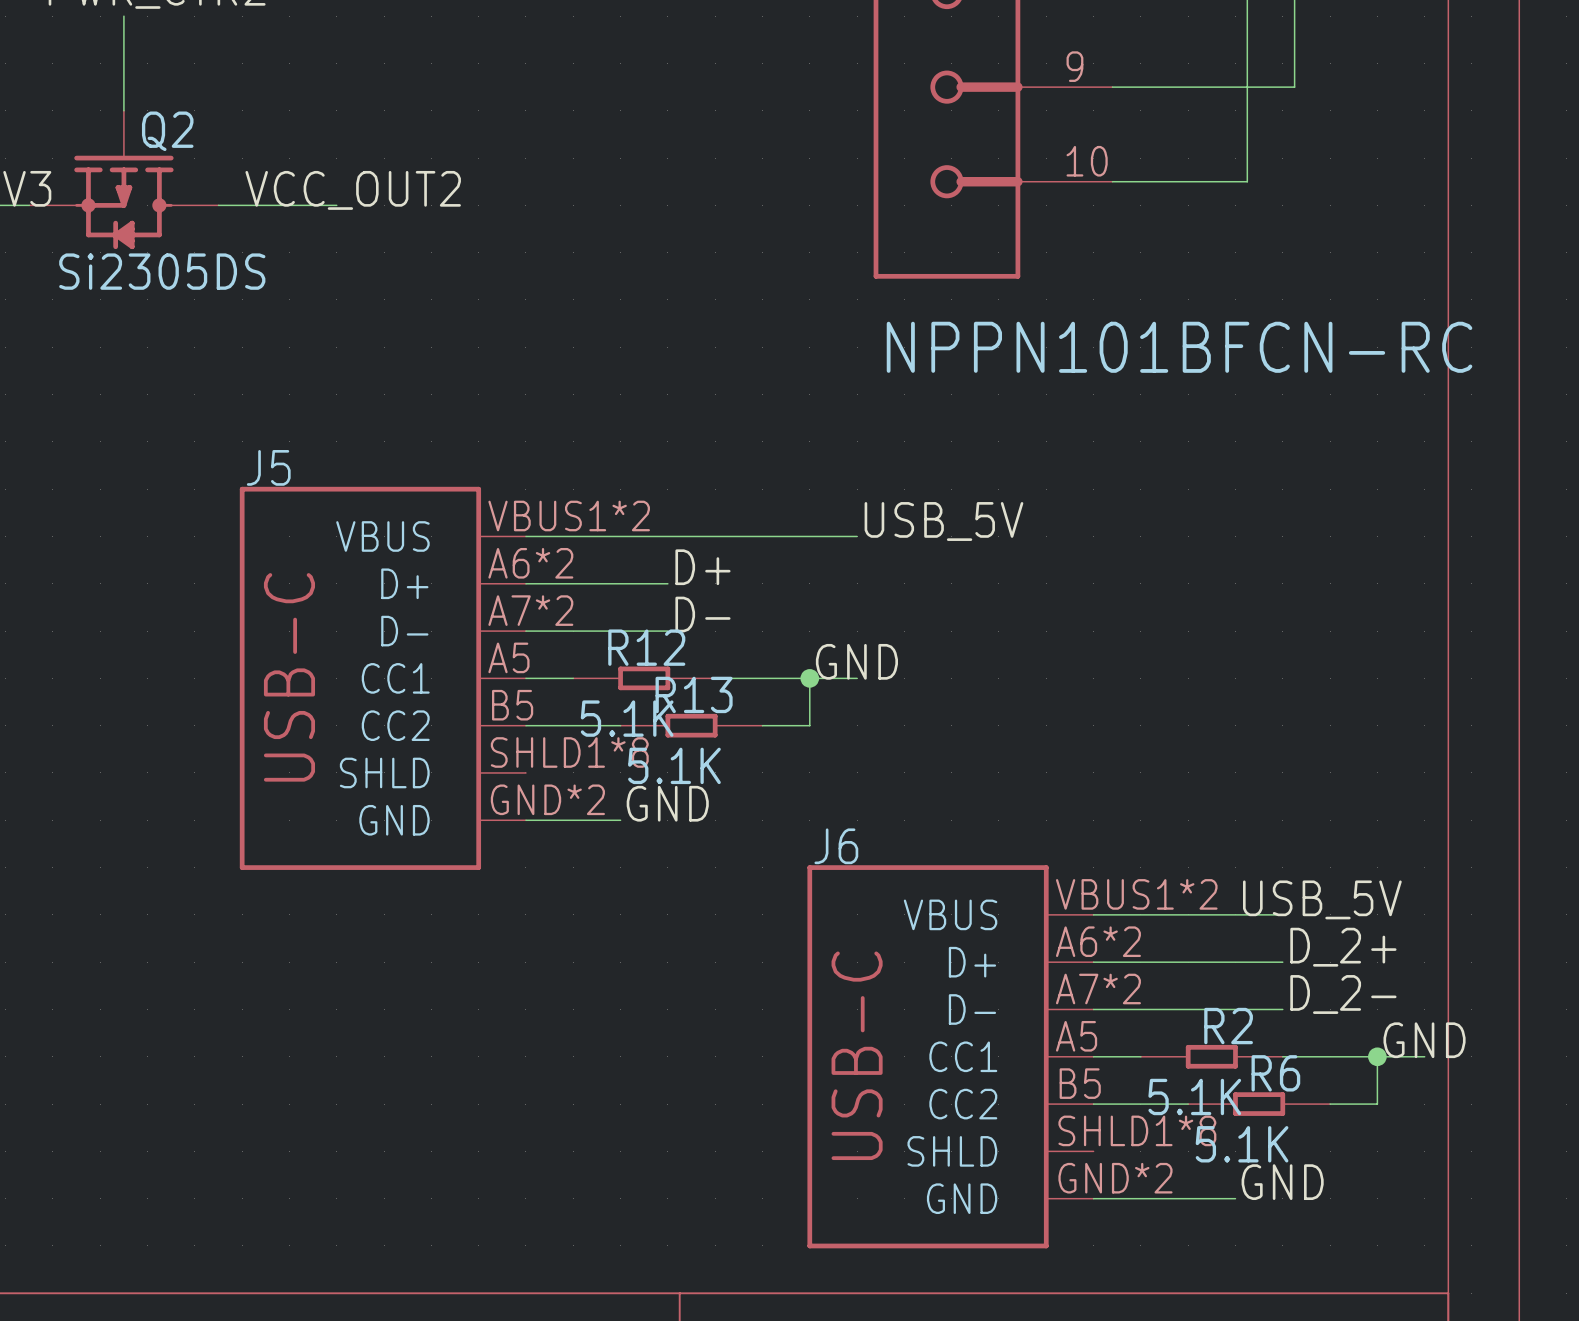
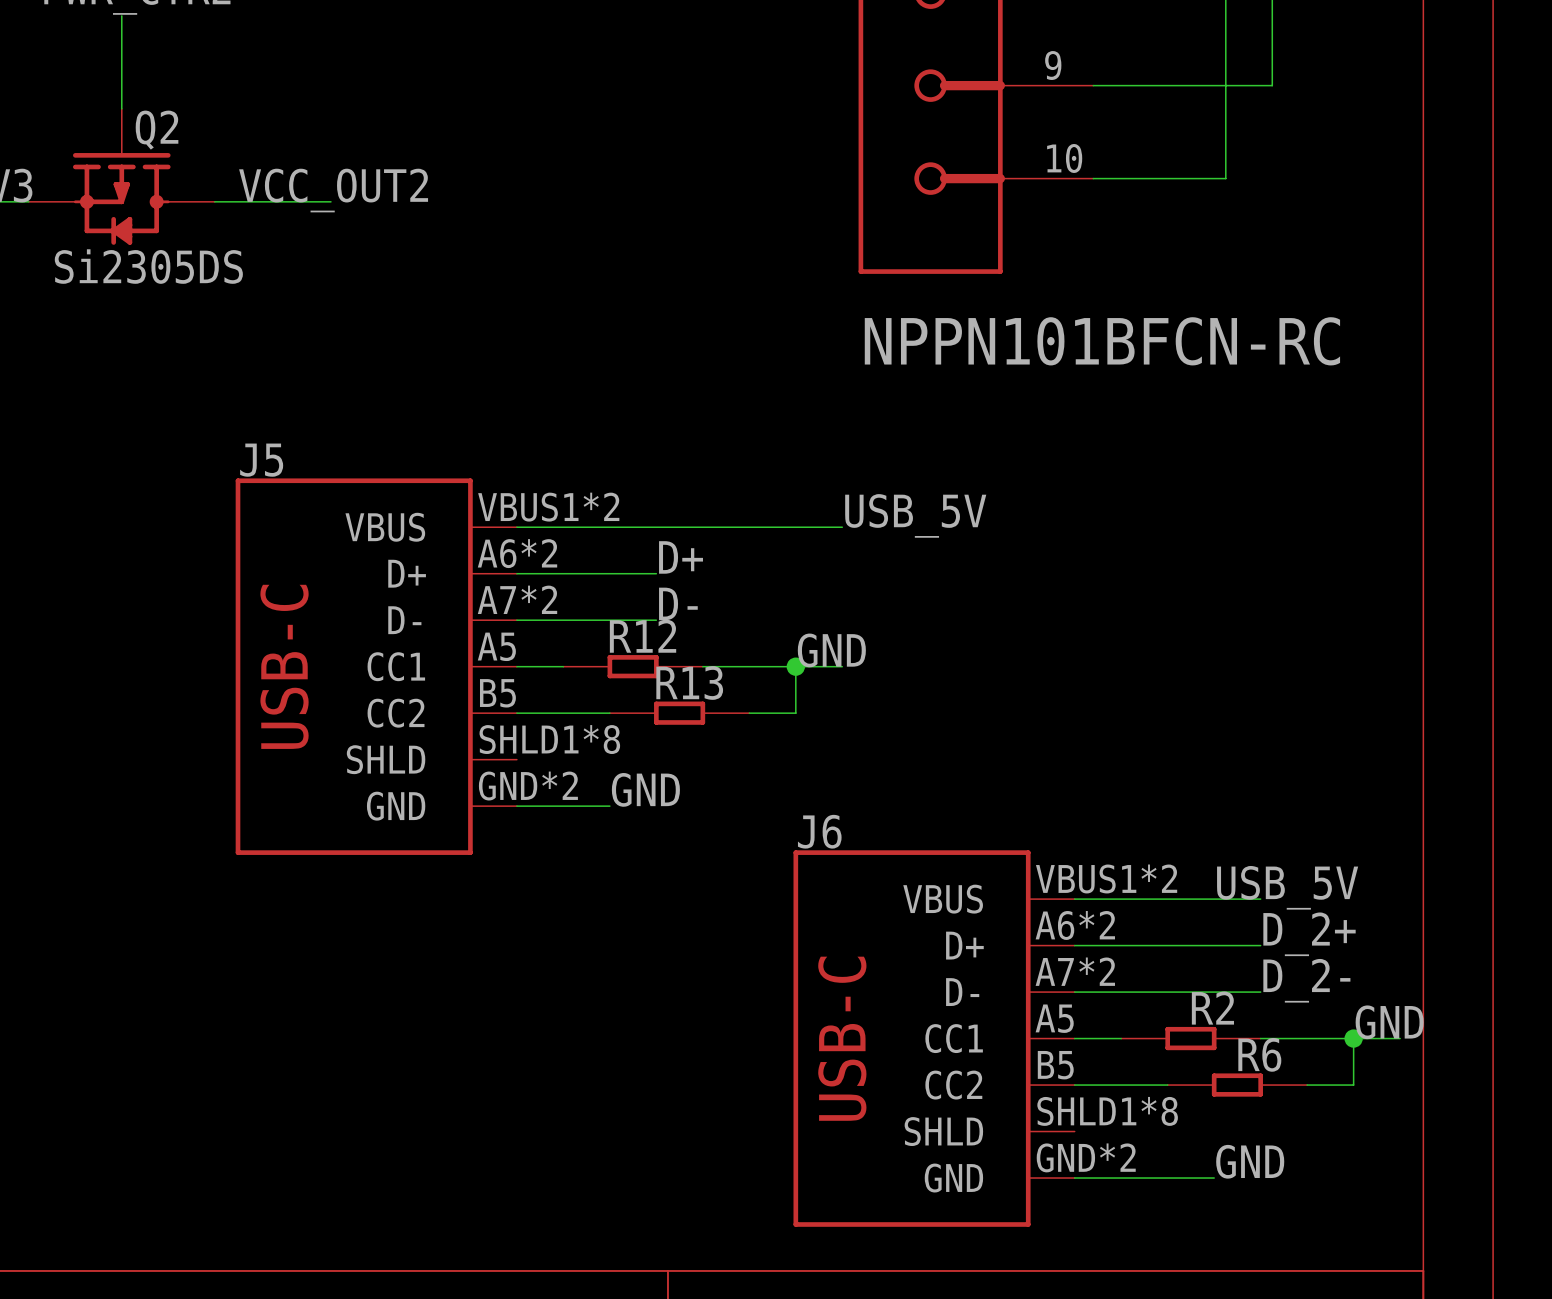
R12 value: 5.1K (627, 718) -> none
R13 value: 5.1K (674, 765) -> none
R2 value: 5.1K (1194, 1096) -> none
R6 value: 5.1K (1242, 1144) -> none

